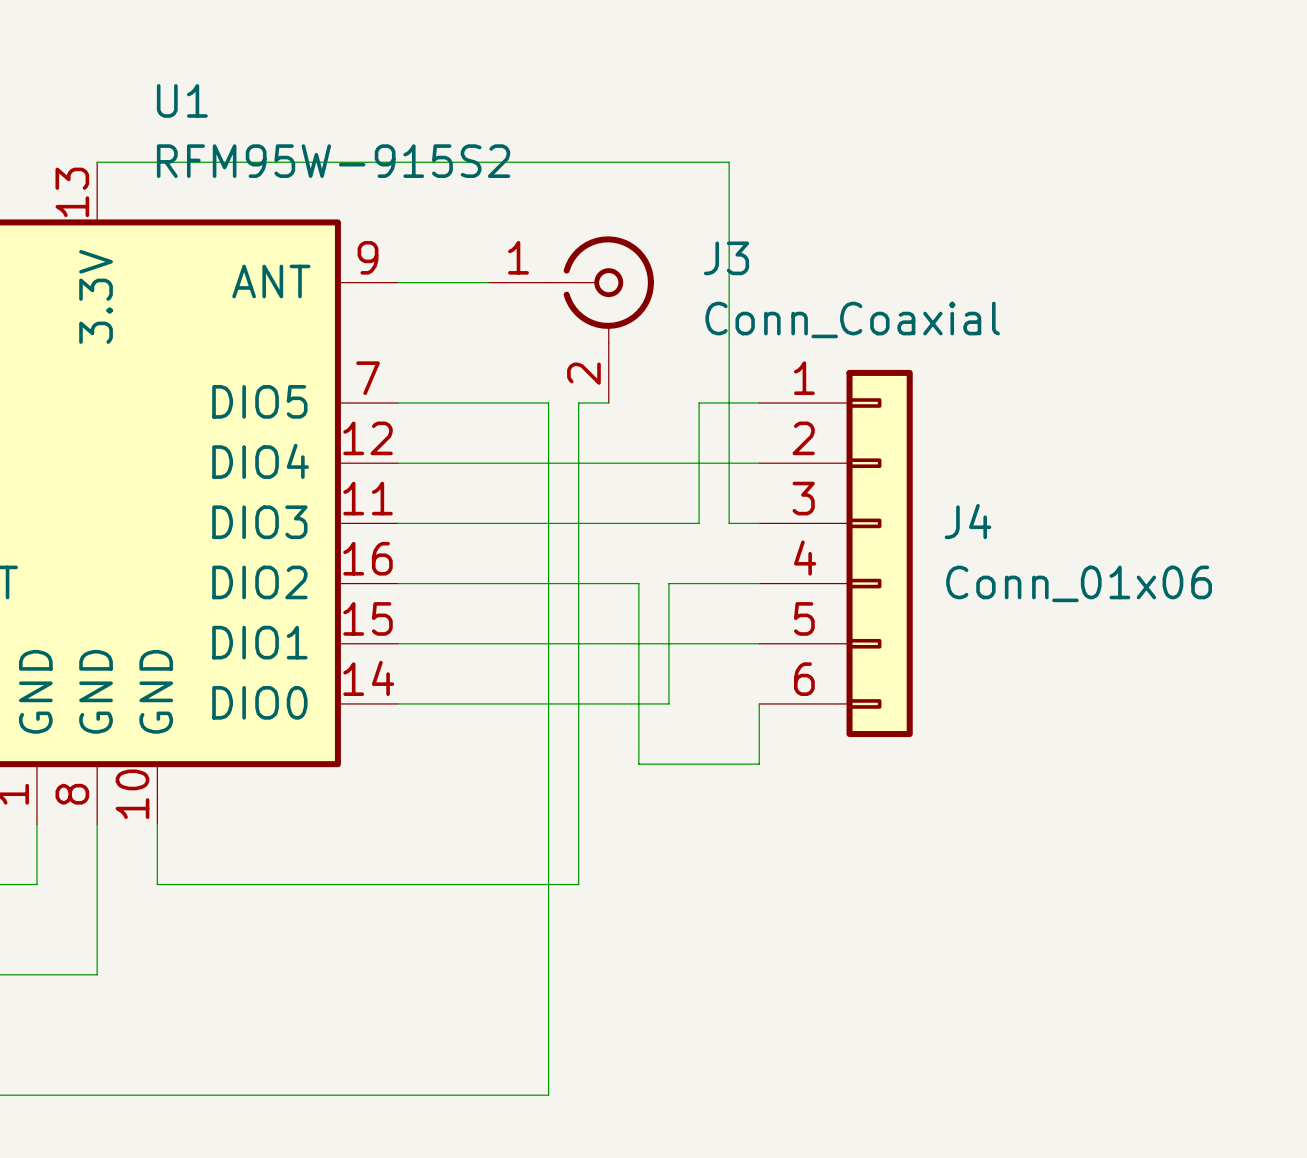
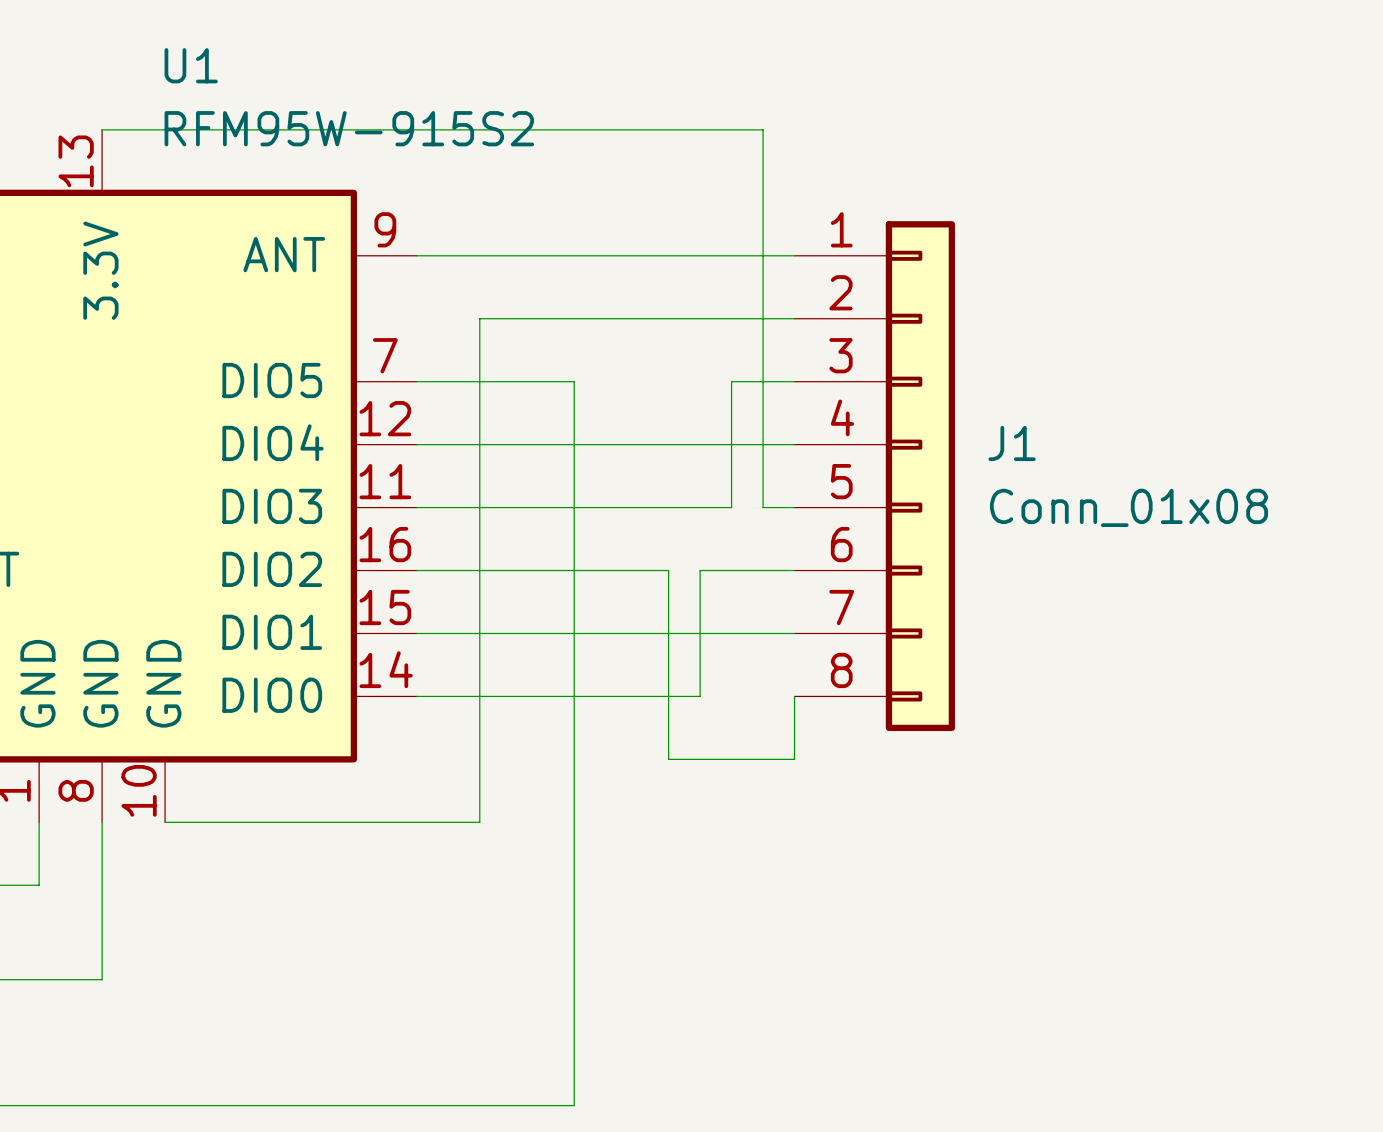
wire: none -> (511, 255) (794, 255)
J3: Conn_Coaxial (571, 319) -> none
wire: (608, 403) (578, 403) (578, 884) (157, 884) (157, 824) -> (794, 318) (479, 318) (479, 822) (165, 822)
J1: none -> Conn_01x08 (874, 476)
J4: Conn_01x06 (835, 553) -> none

